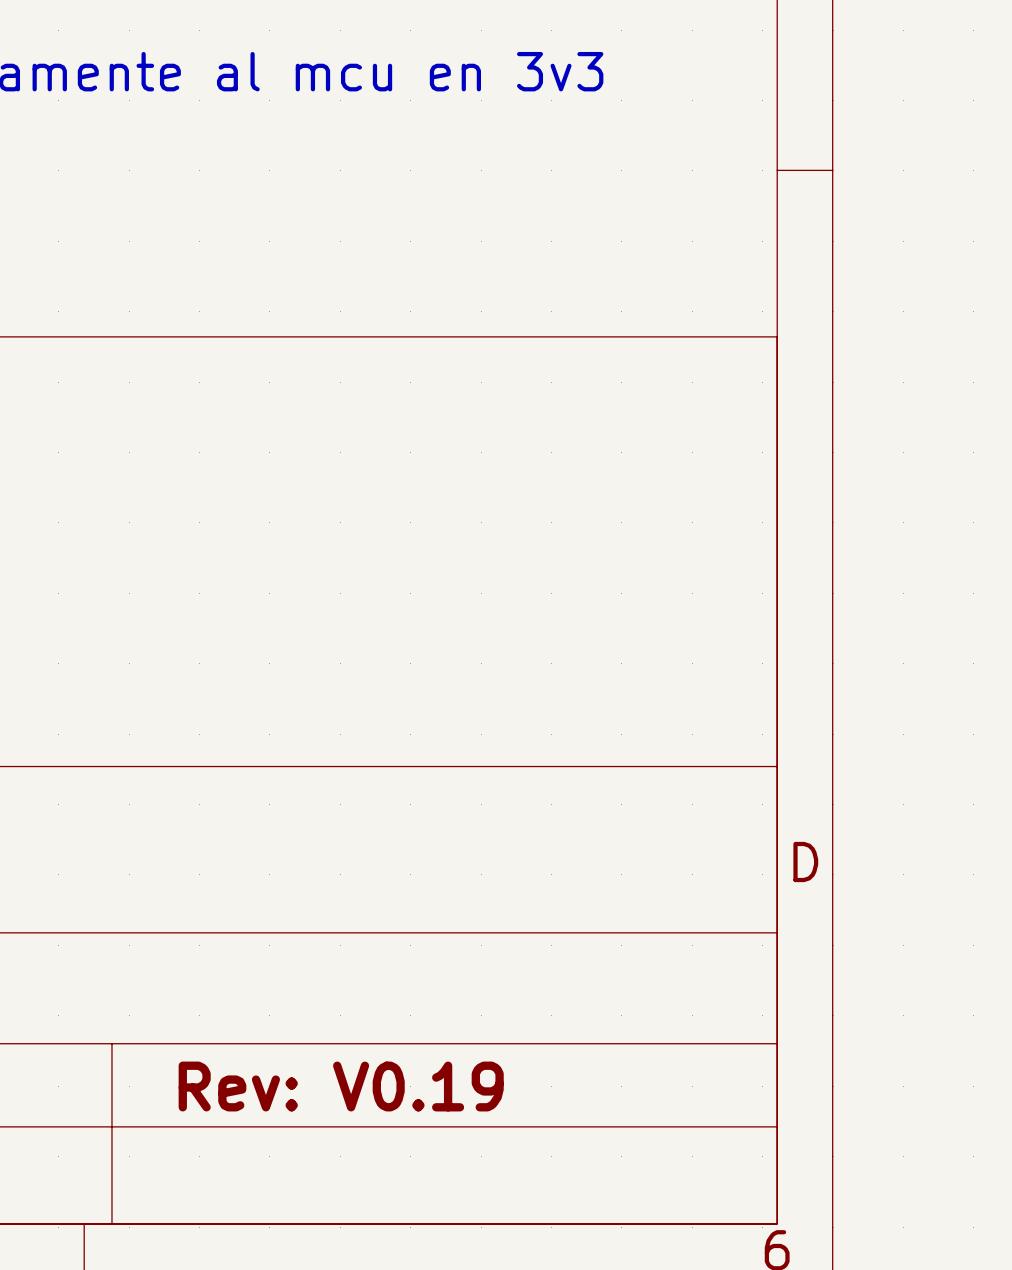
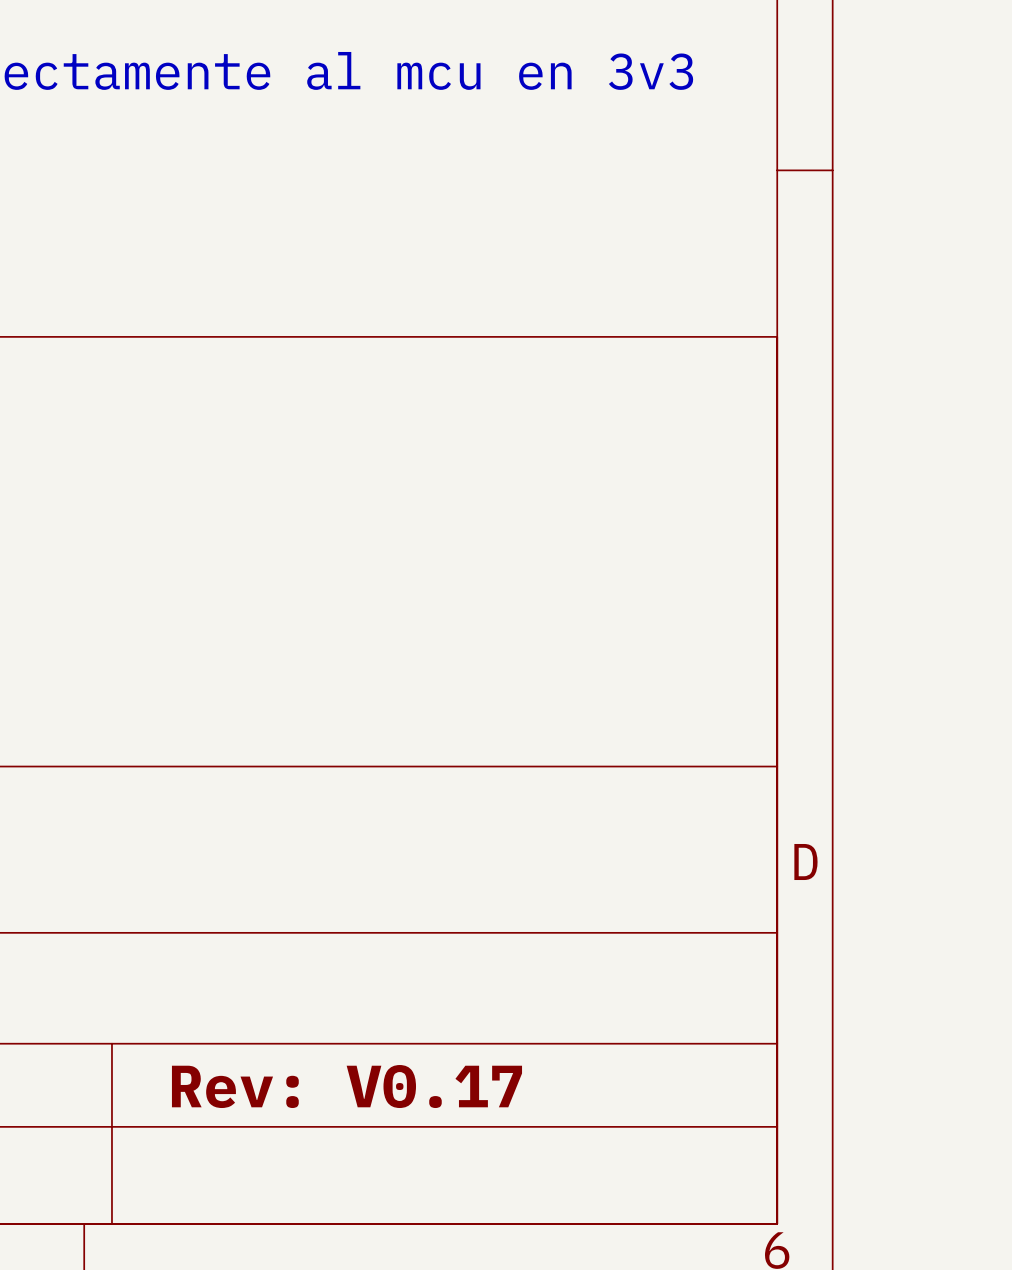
title block: Rev: V0.19 (341, 1086) -> Rev: V0.17 (346, 1086)

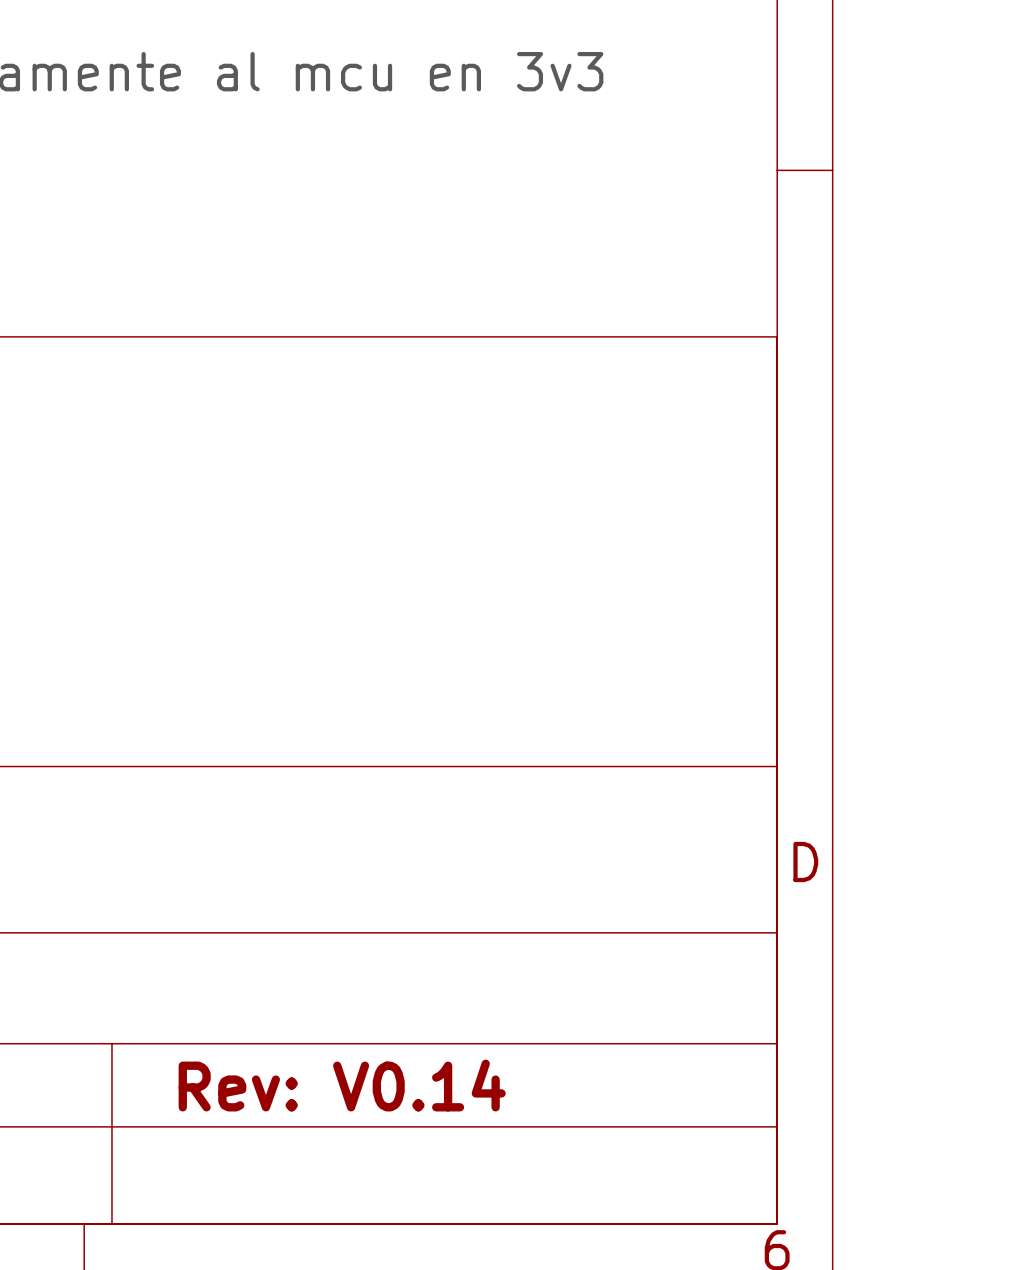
title block: Rev: V0.17 (346, 1086) -> Rev: V0.14 (342, 1085)

